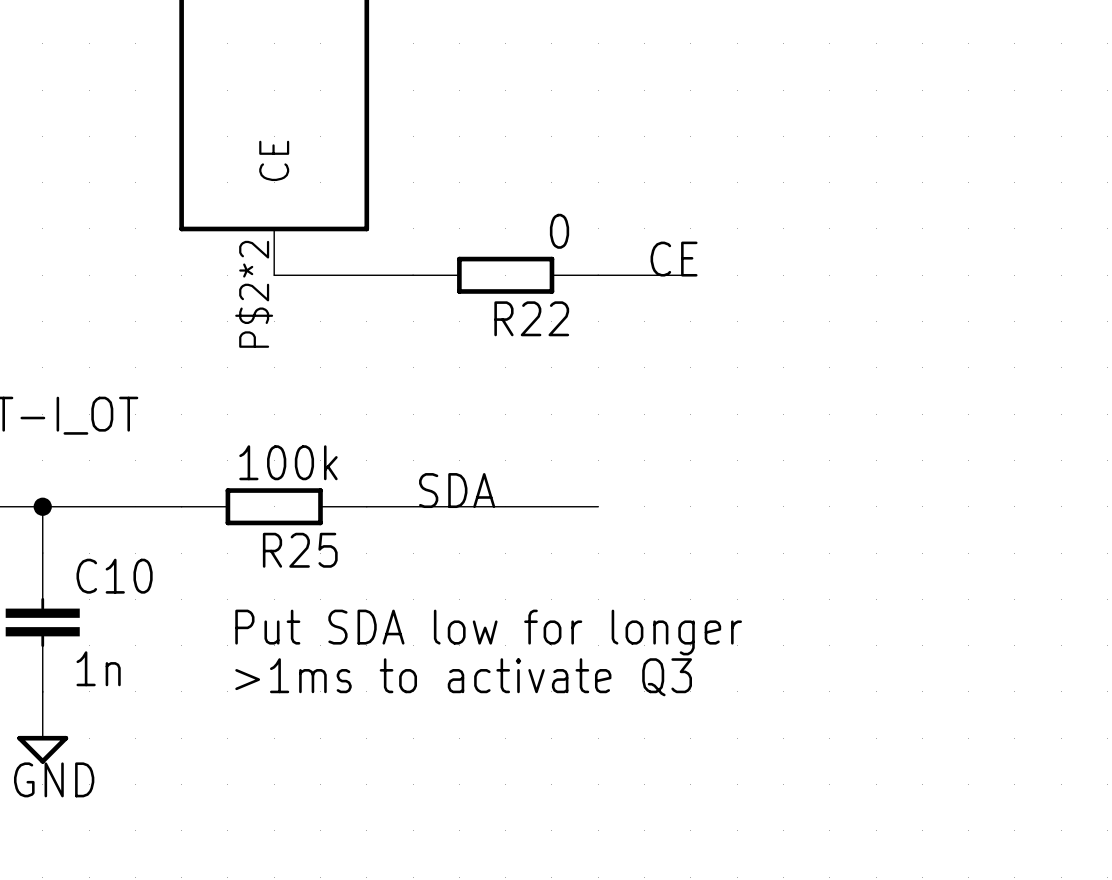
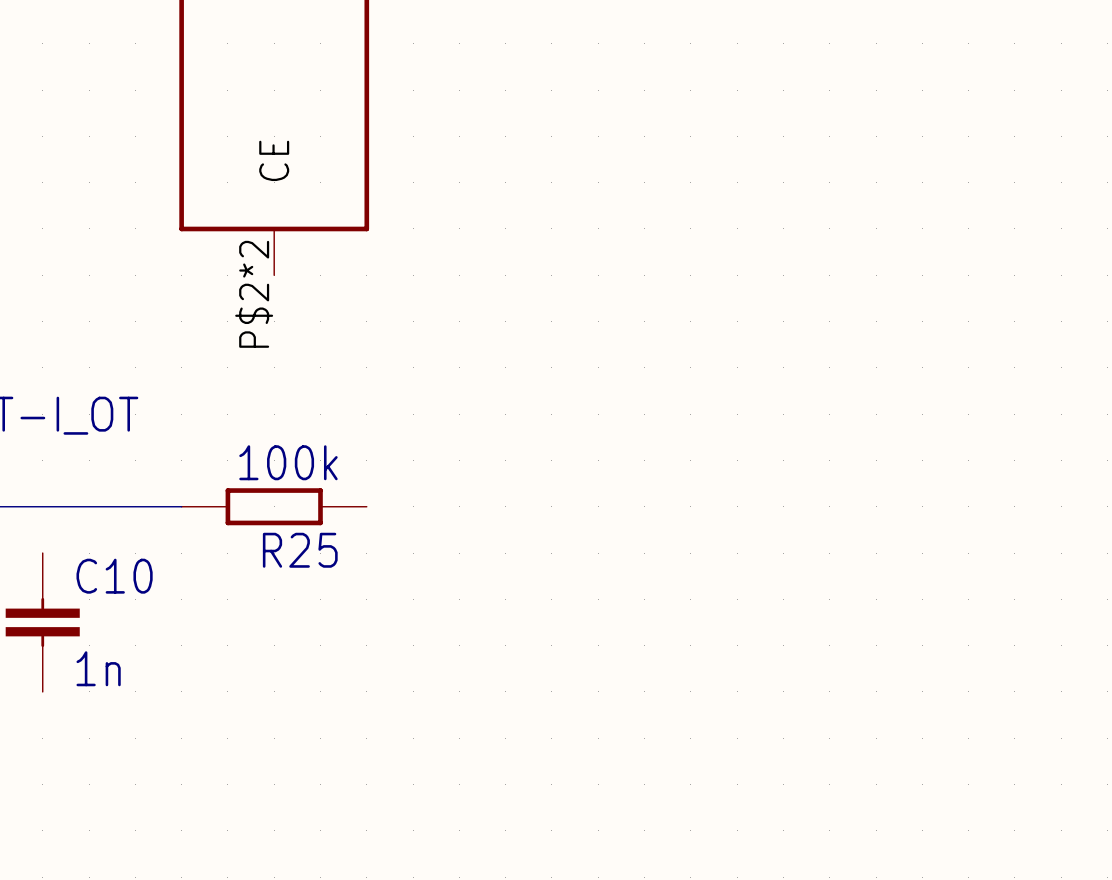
label: CE (674, 259) -> none
wire: (274, 275) (413, 275) -> none
R22: 0 (505, 275) -> none
wire: (598, 275) (690, 275) -> none
label: SDA (457, 490) -> none
wire: (42, 506) (42, 553) -> none
junction: (42, 506) -> none
wire: (366, 506) (598, 506) -> none
text: Put SDA low for longer (488, 632) -> none
text: >1ms to activate Q3 (463, 677) -> none
power symbol: GND (42, 727) -> none

